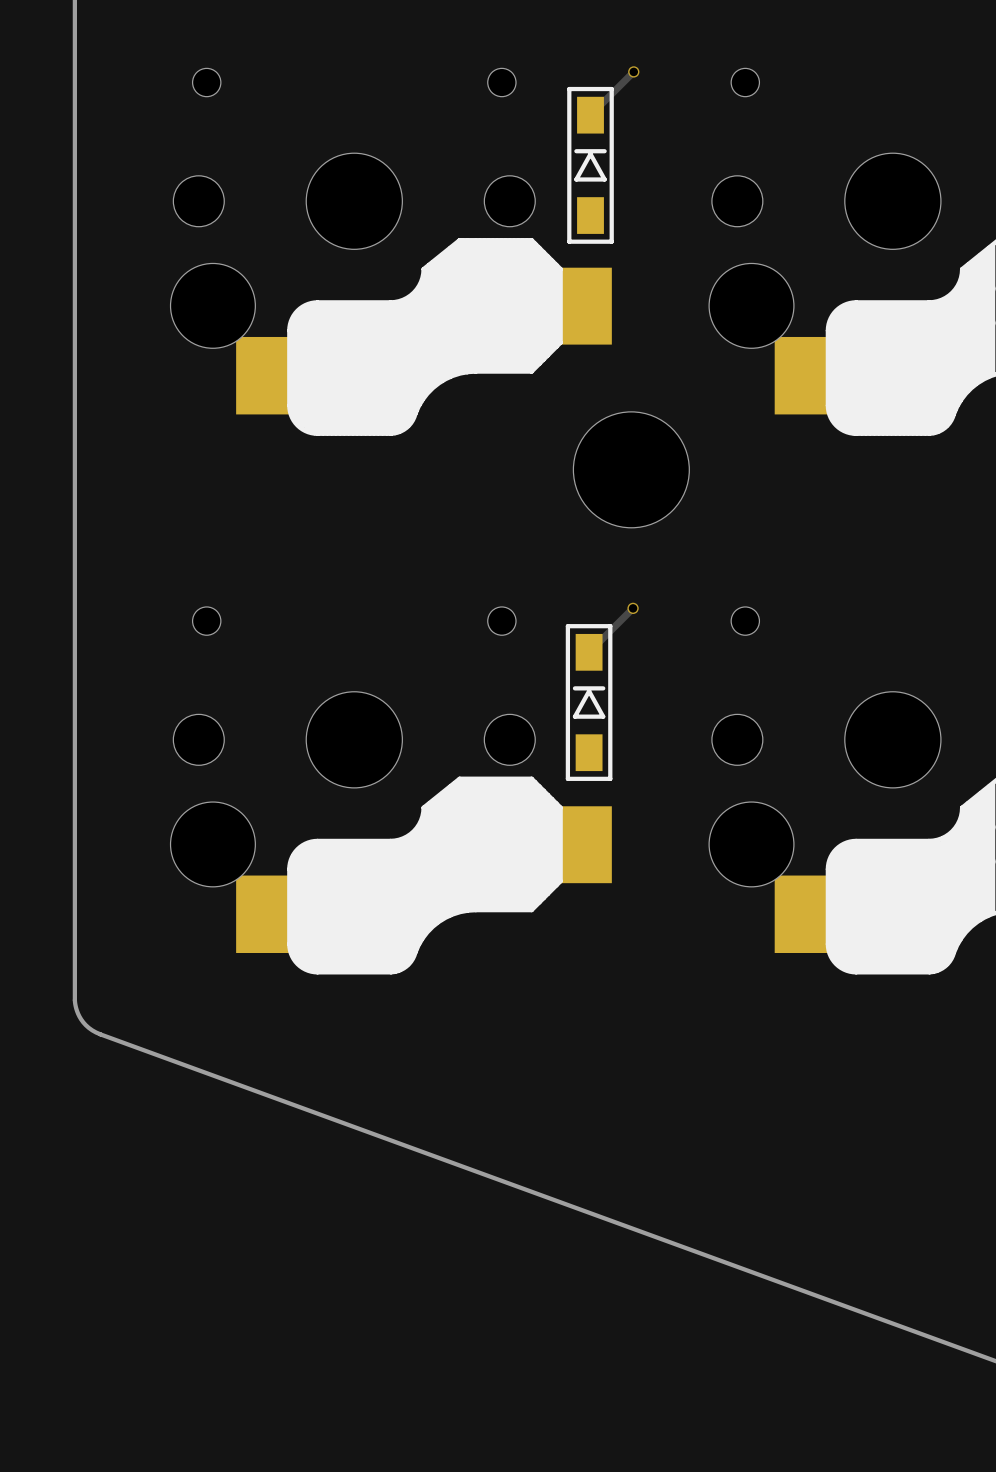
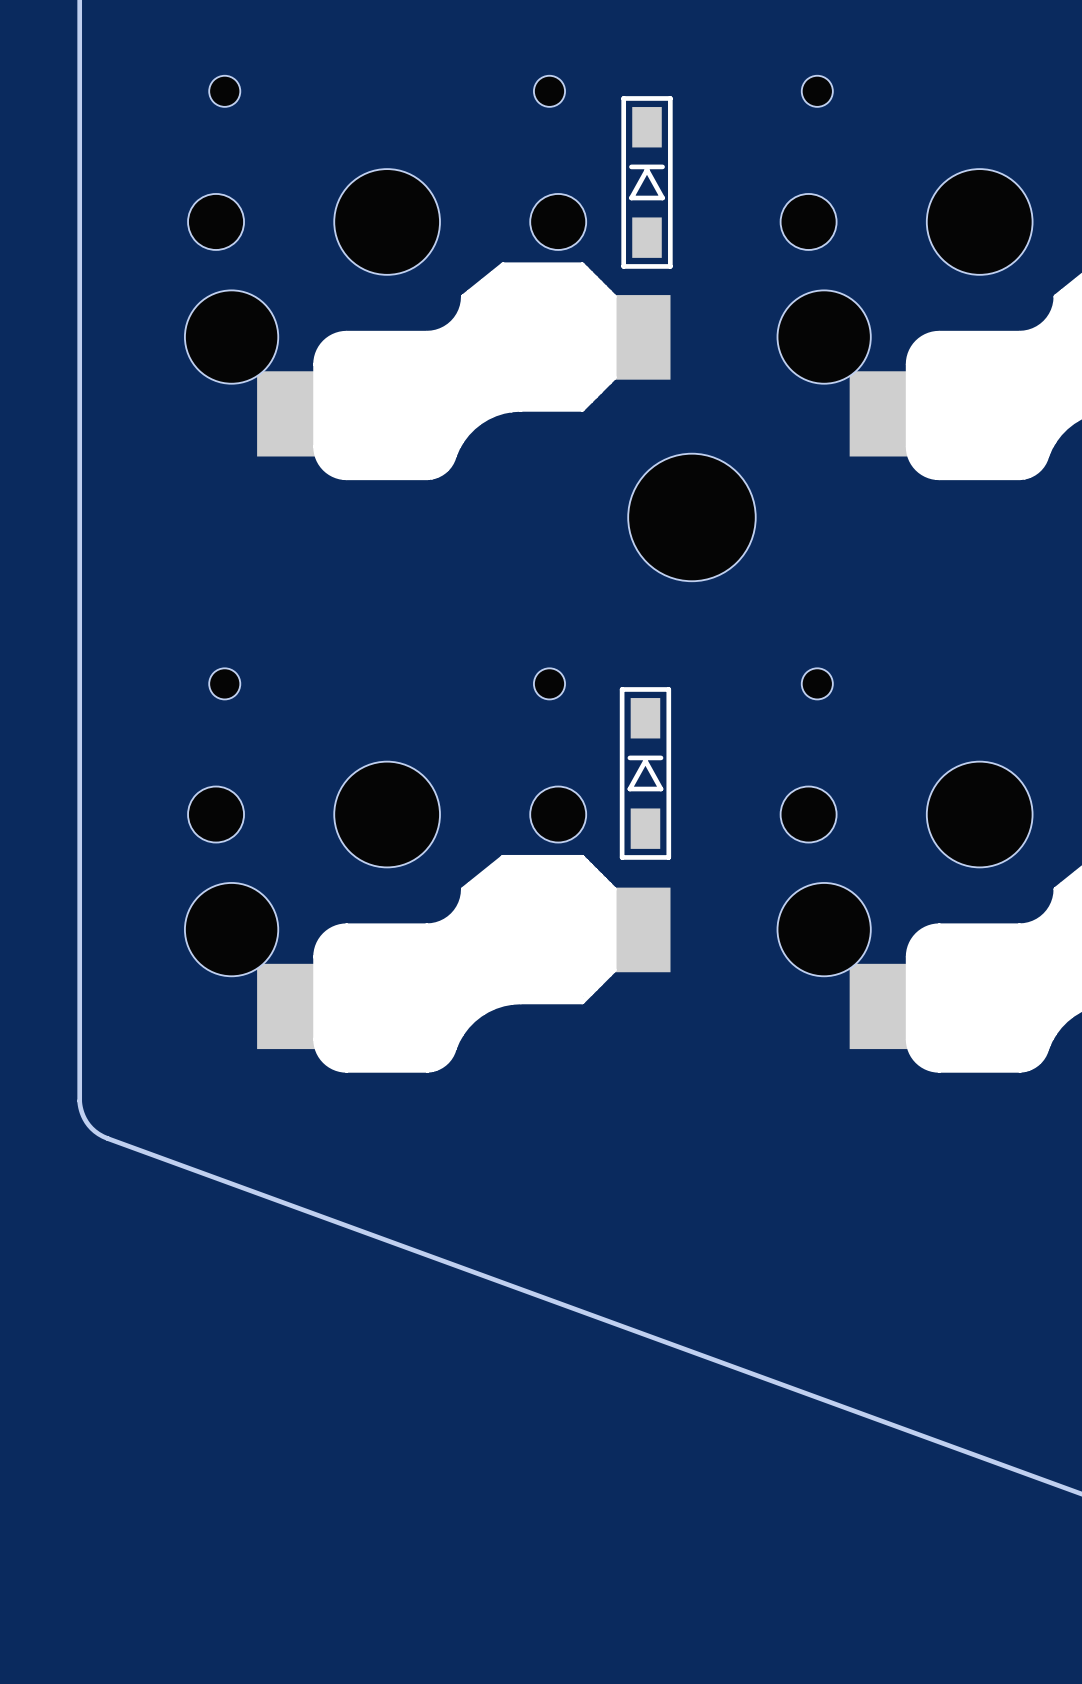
track: (633, 71) (590, 115) -> none
via: (633, 71) -> none
track: (633, 608) (589, 652) -> none
via: (633, 608) -> none

